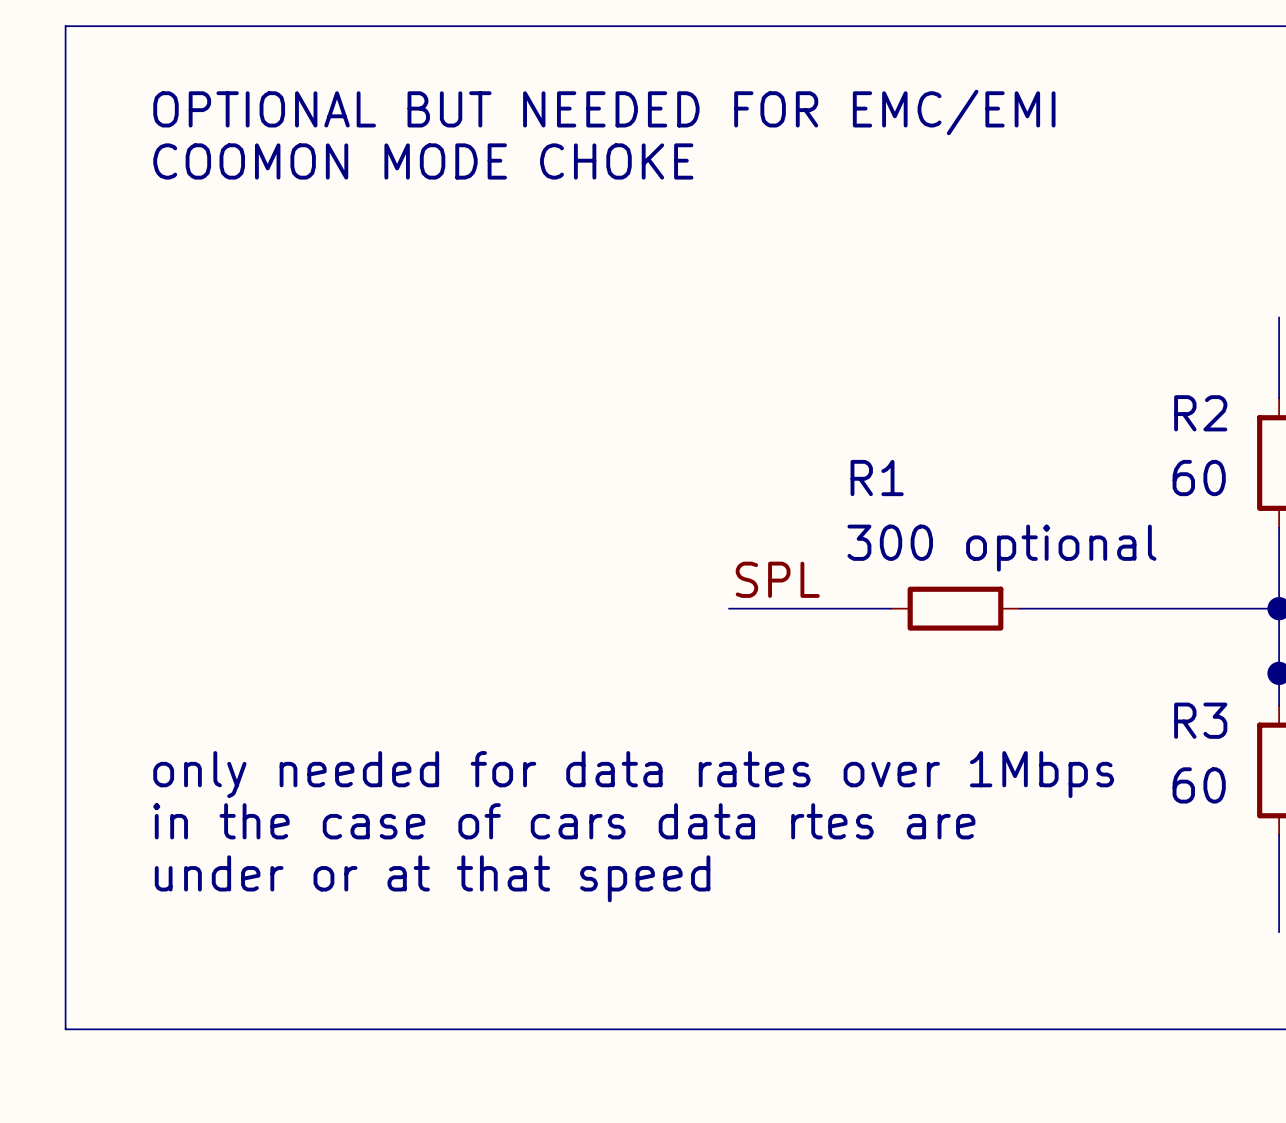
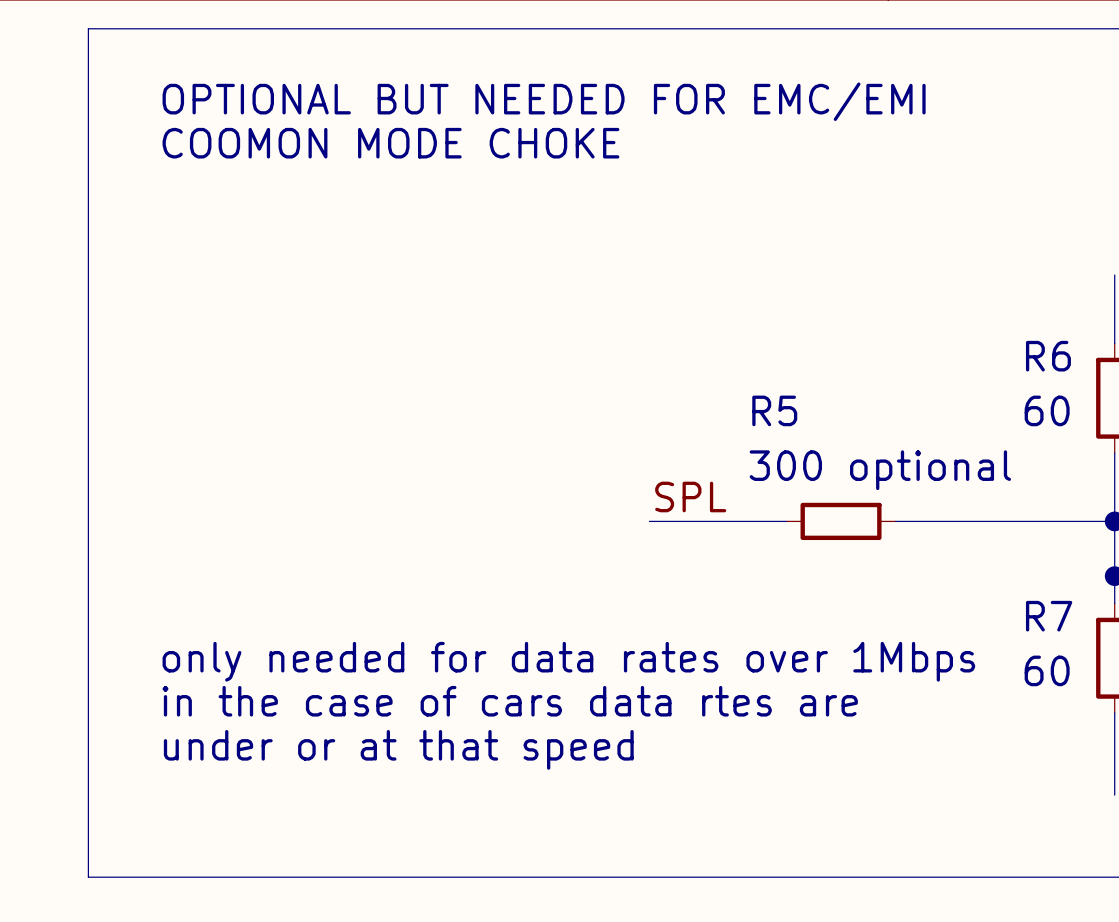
R2 name: R2 (1200, 413) -> R6 (1048, 356)
R1 name: R1 (877, 478) -> R5 (774, 410)
R3 name: R3 (1200, 720) -> R7 (1049, 616)

